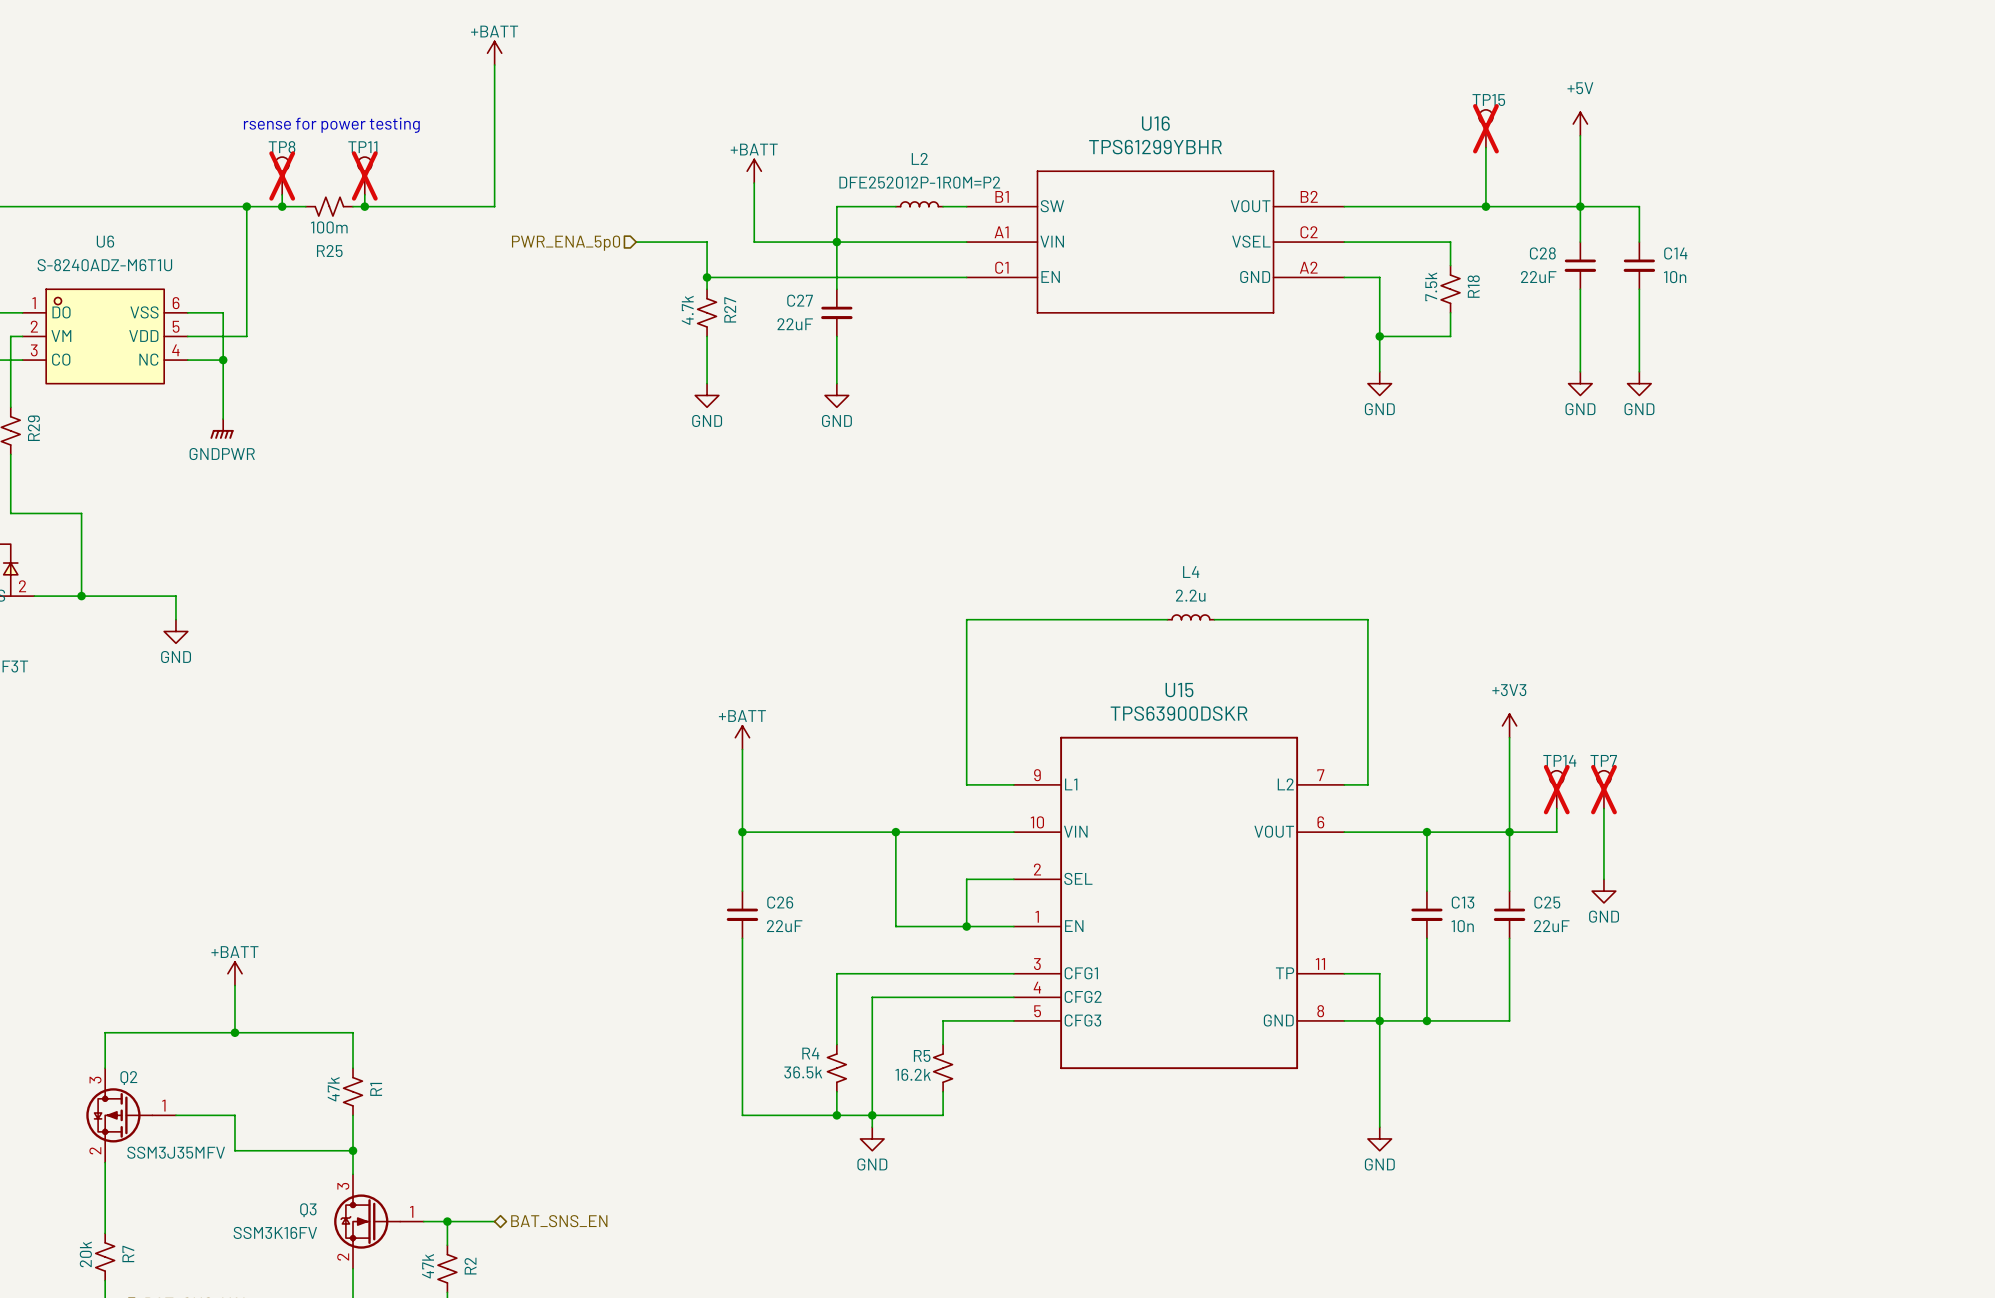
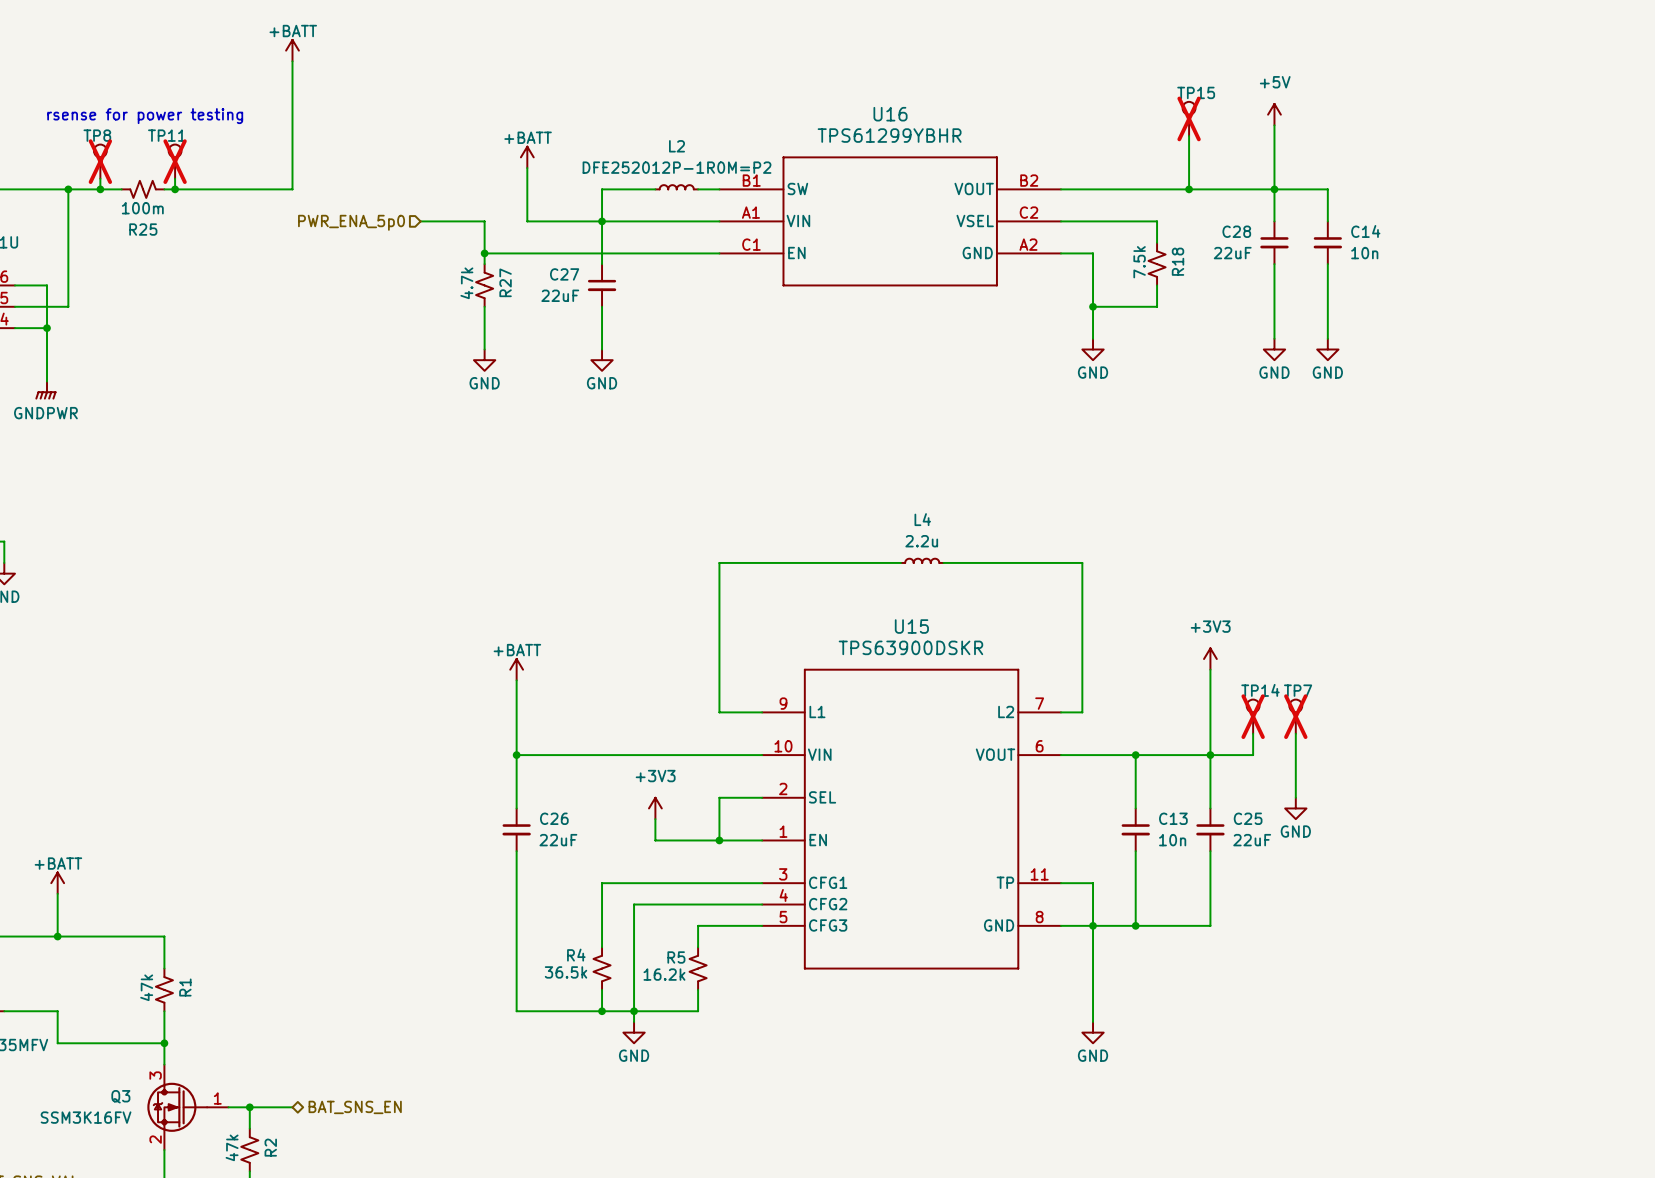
wire: (895, 832) (895, 902) -> none
junction: (895, 832) -> none
power symbol: none -> +3V3 (655, 808)

